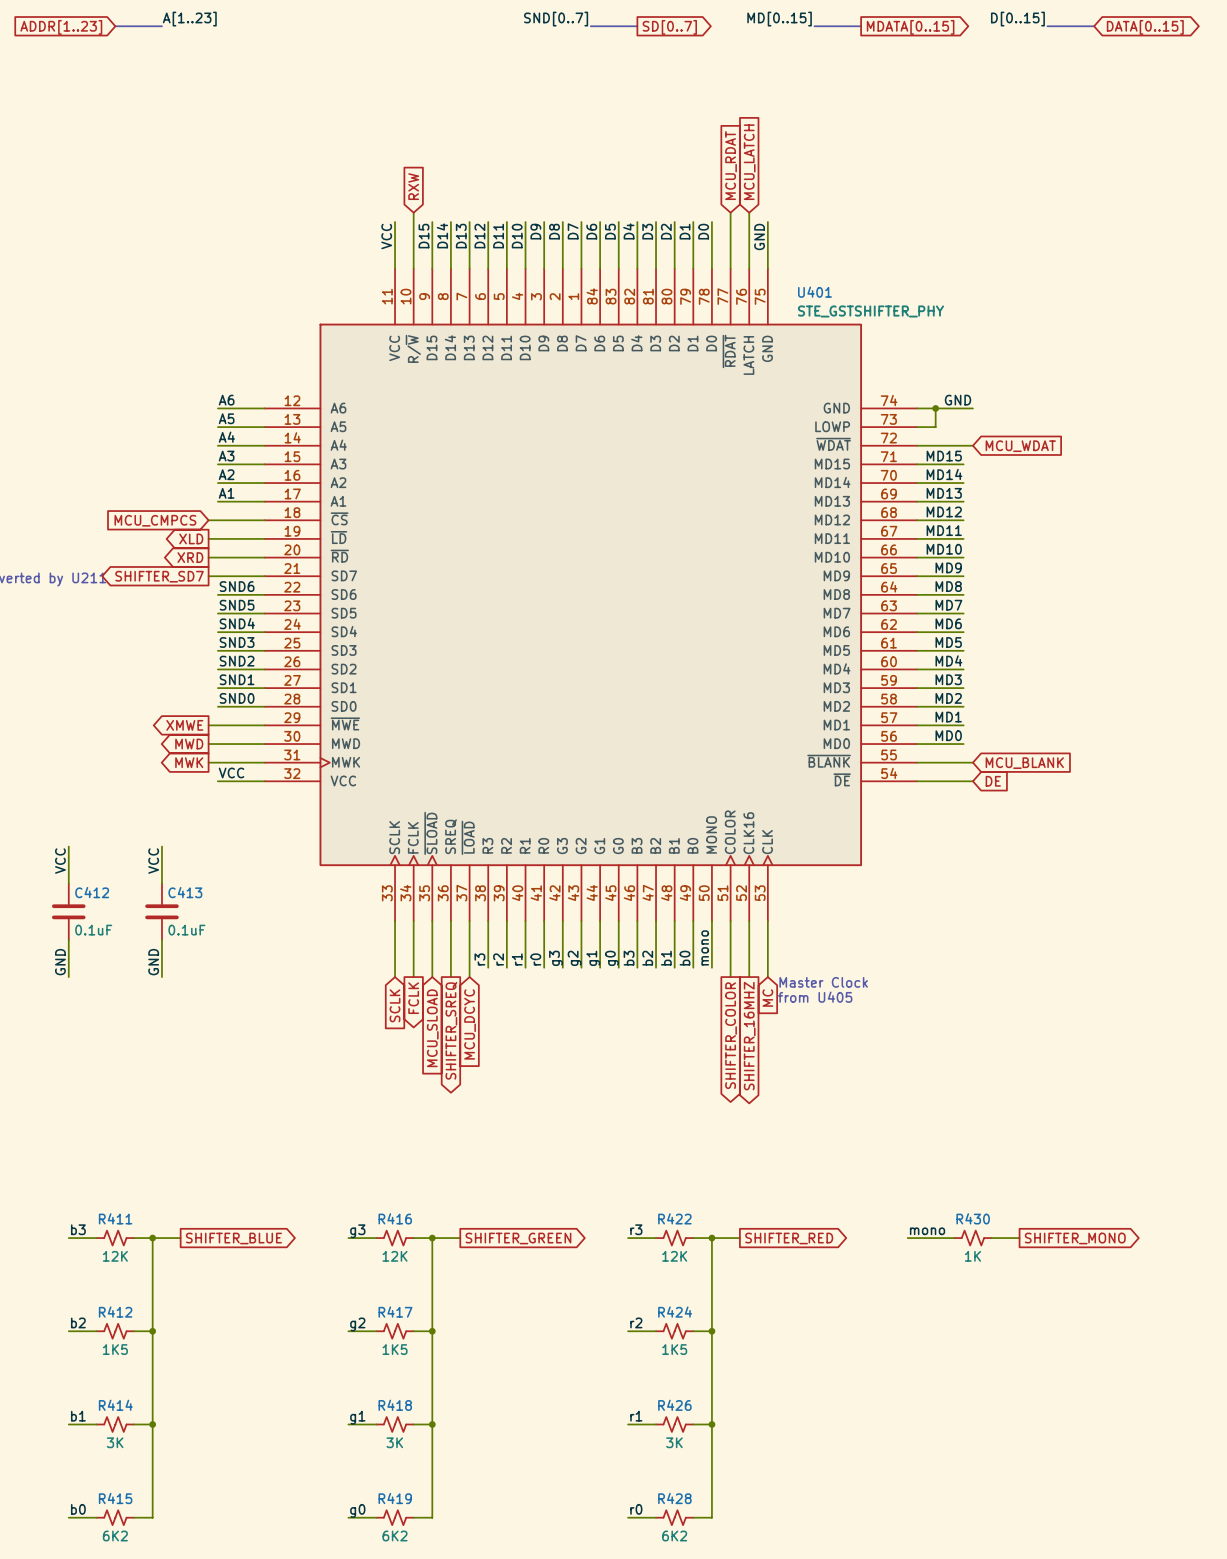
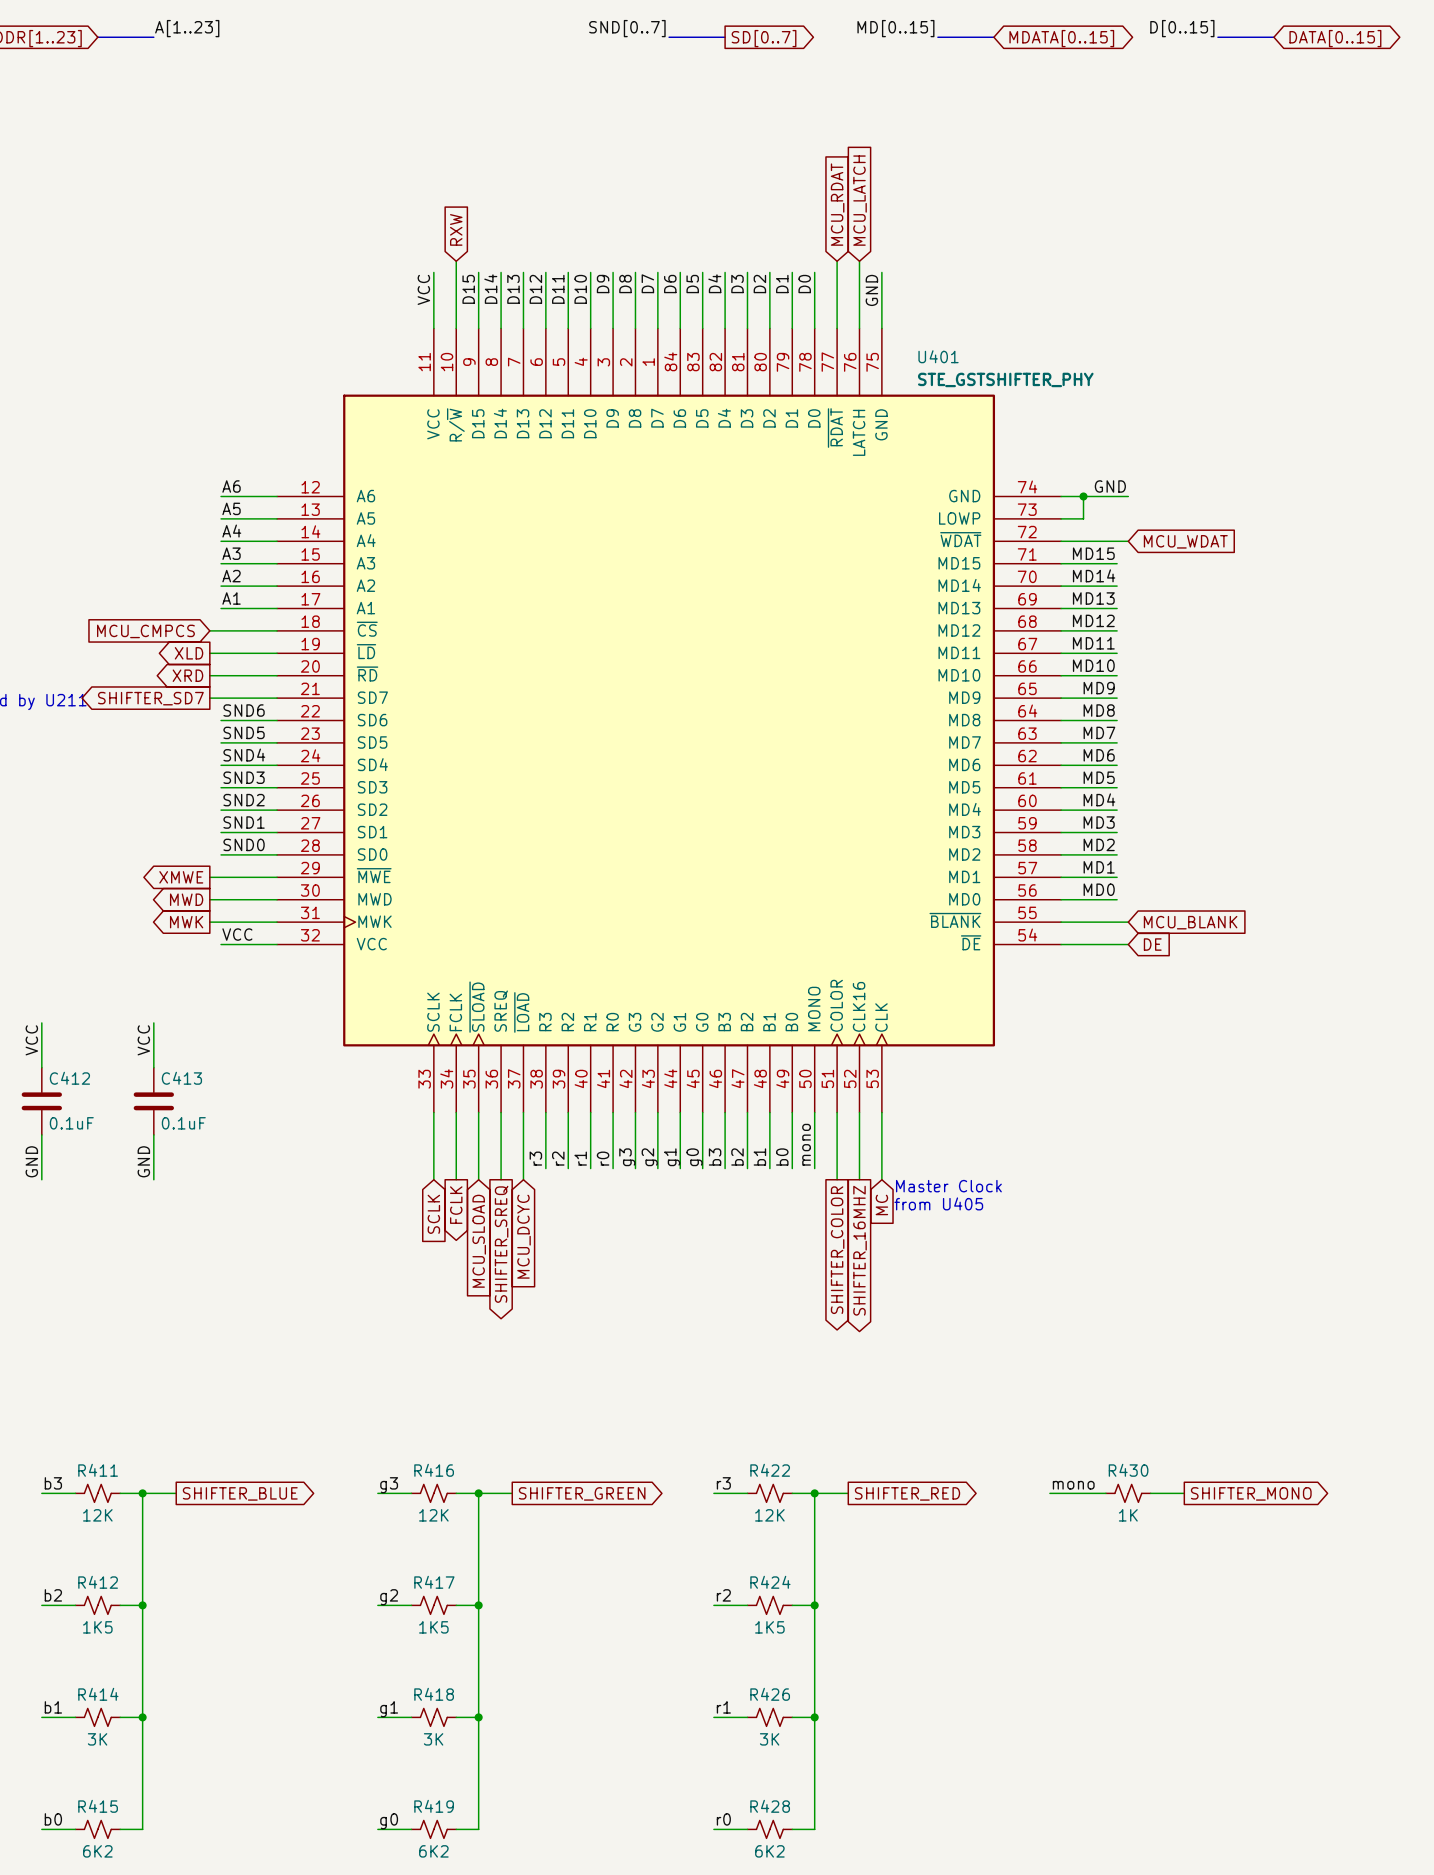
global label shape: output (910, 27) -> bidirectional (1061, 38)

